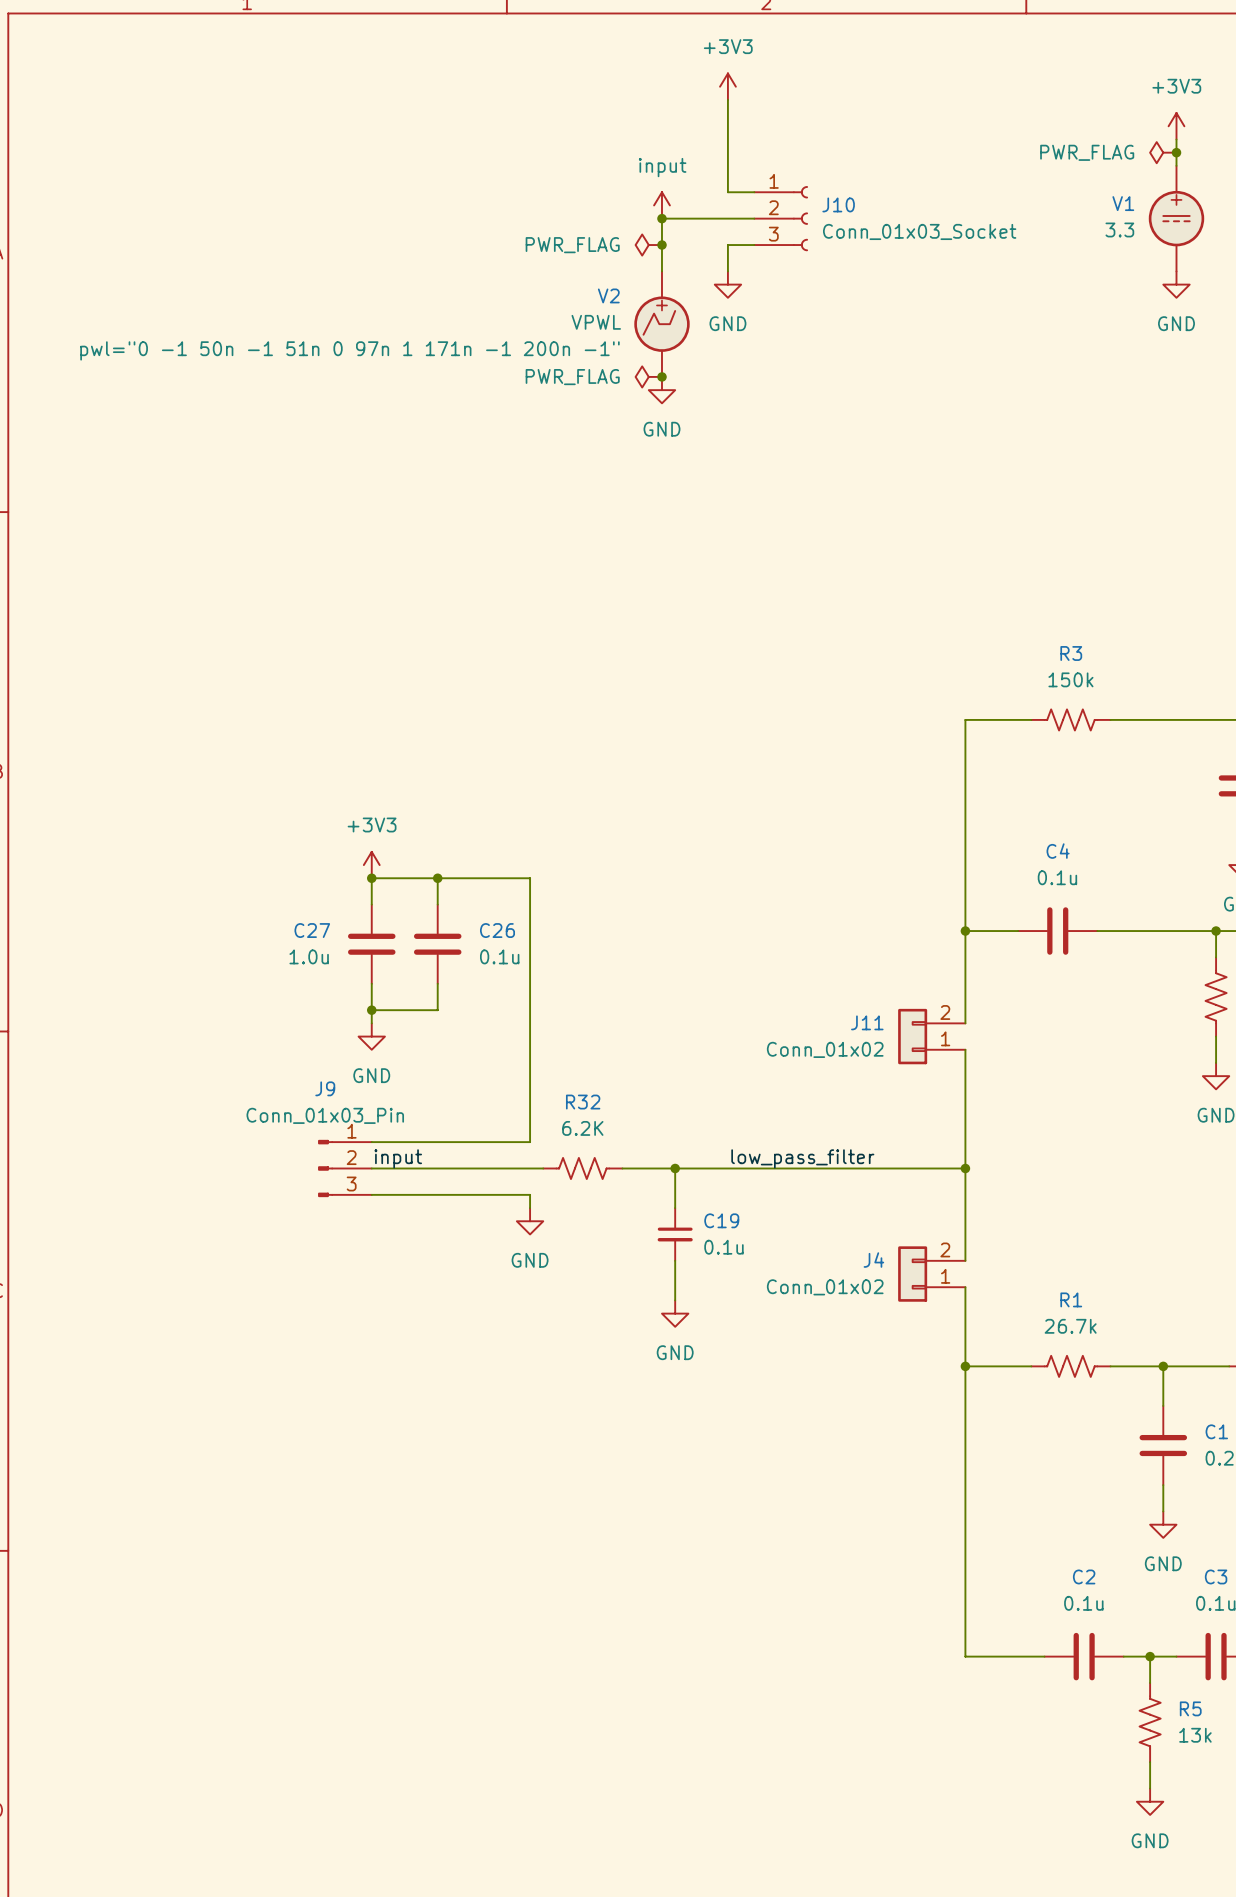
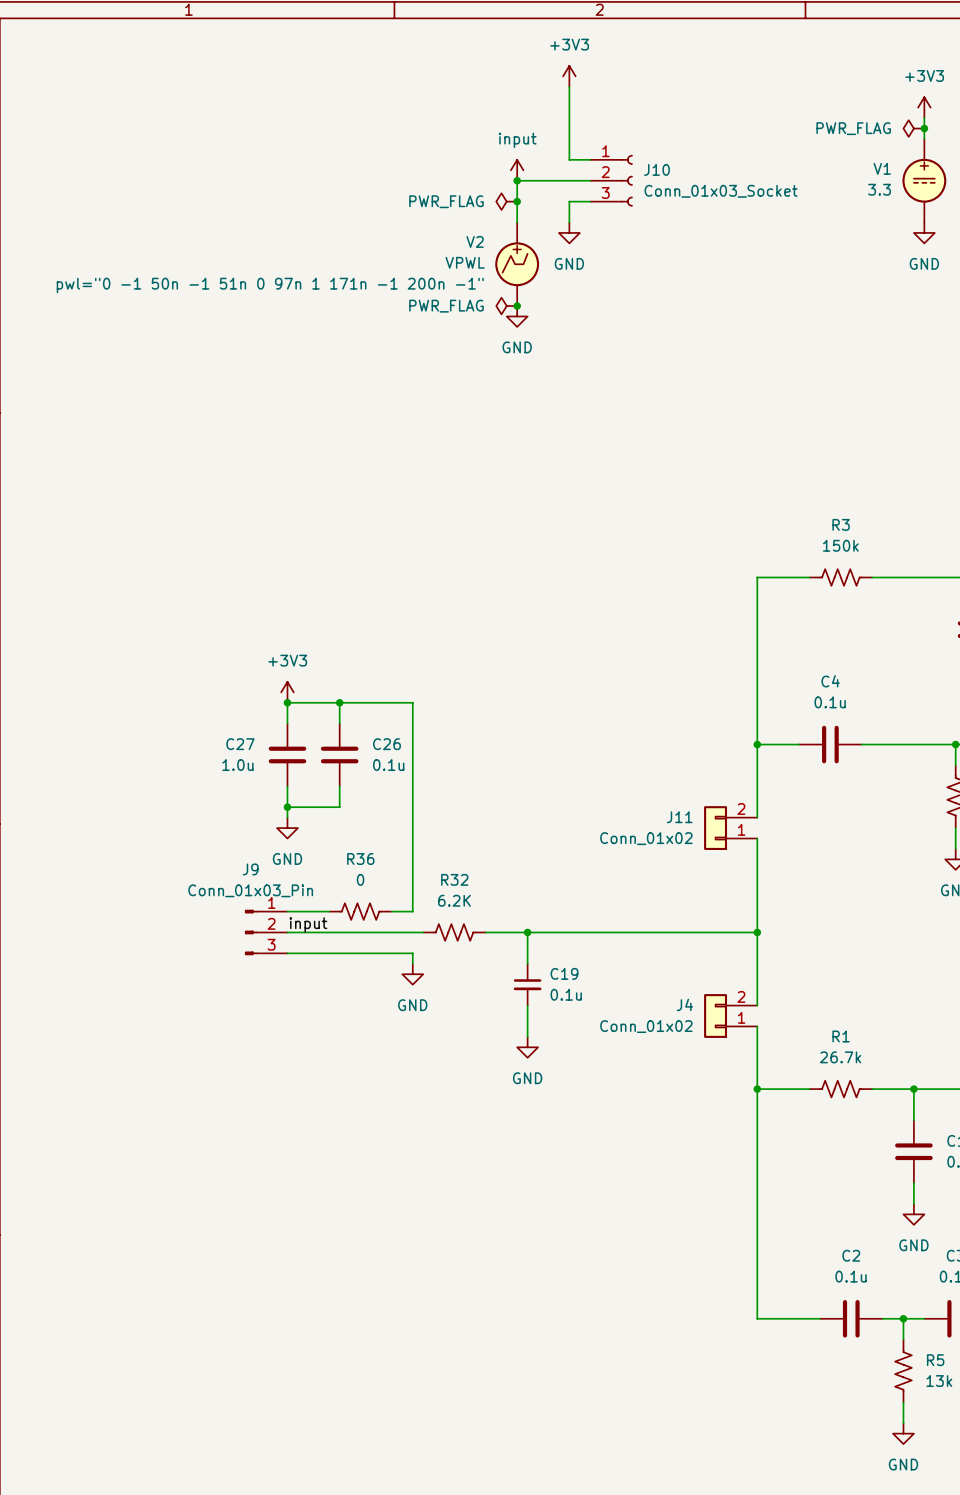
R36: none -> 0 (360, 911)
label: low_pass_filter (802, 1158) -> none

